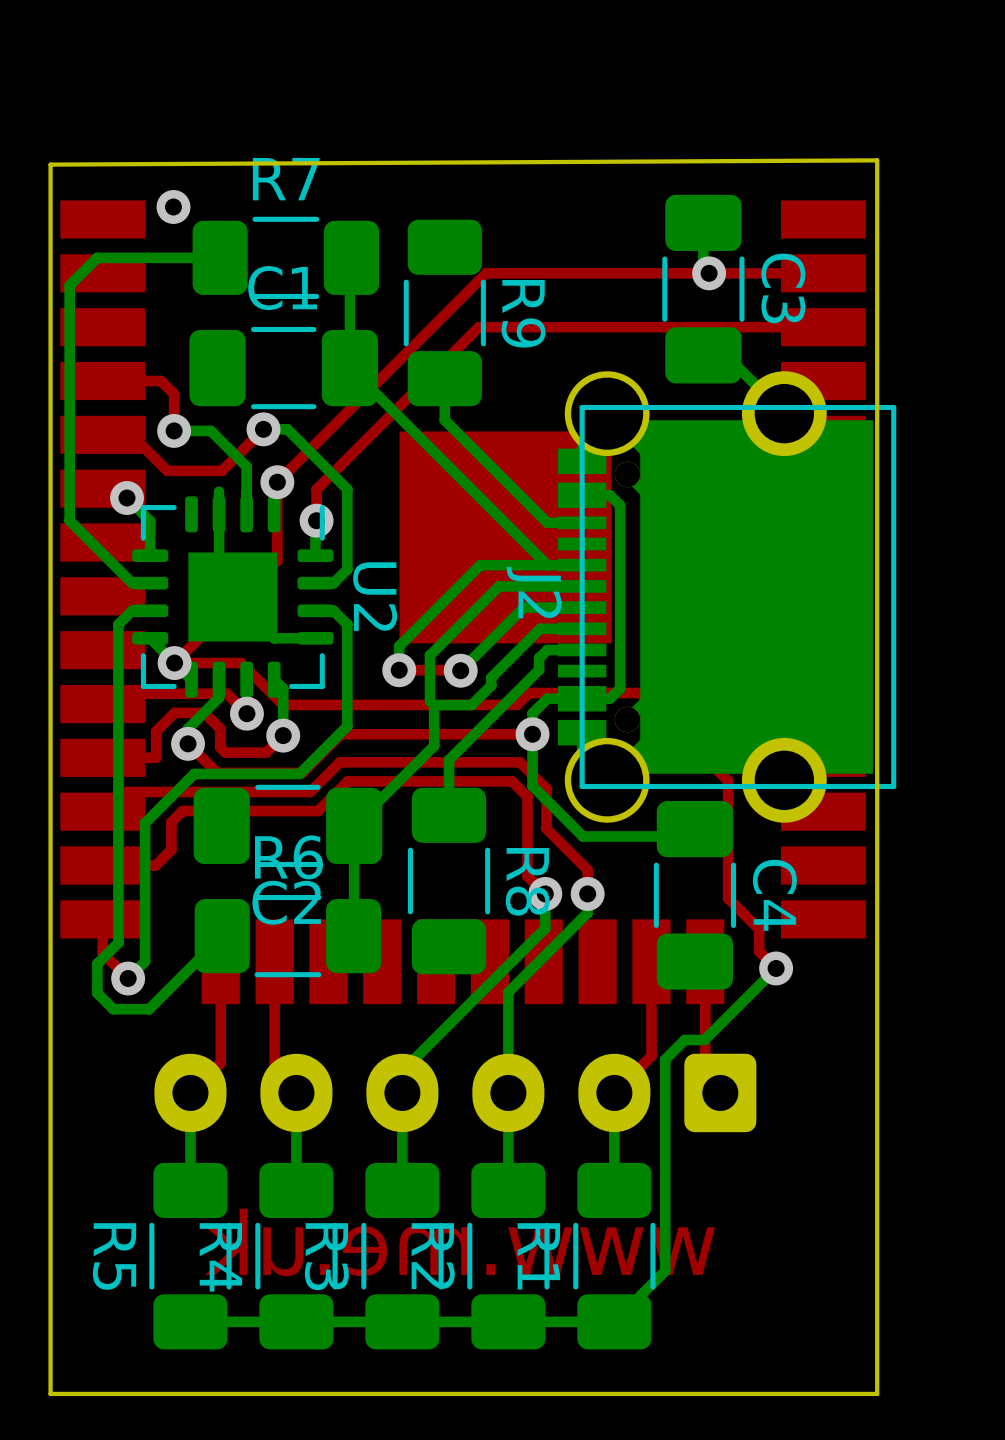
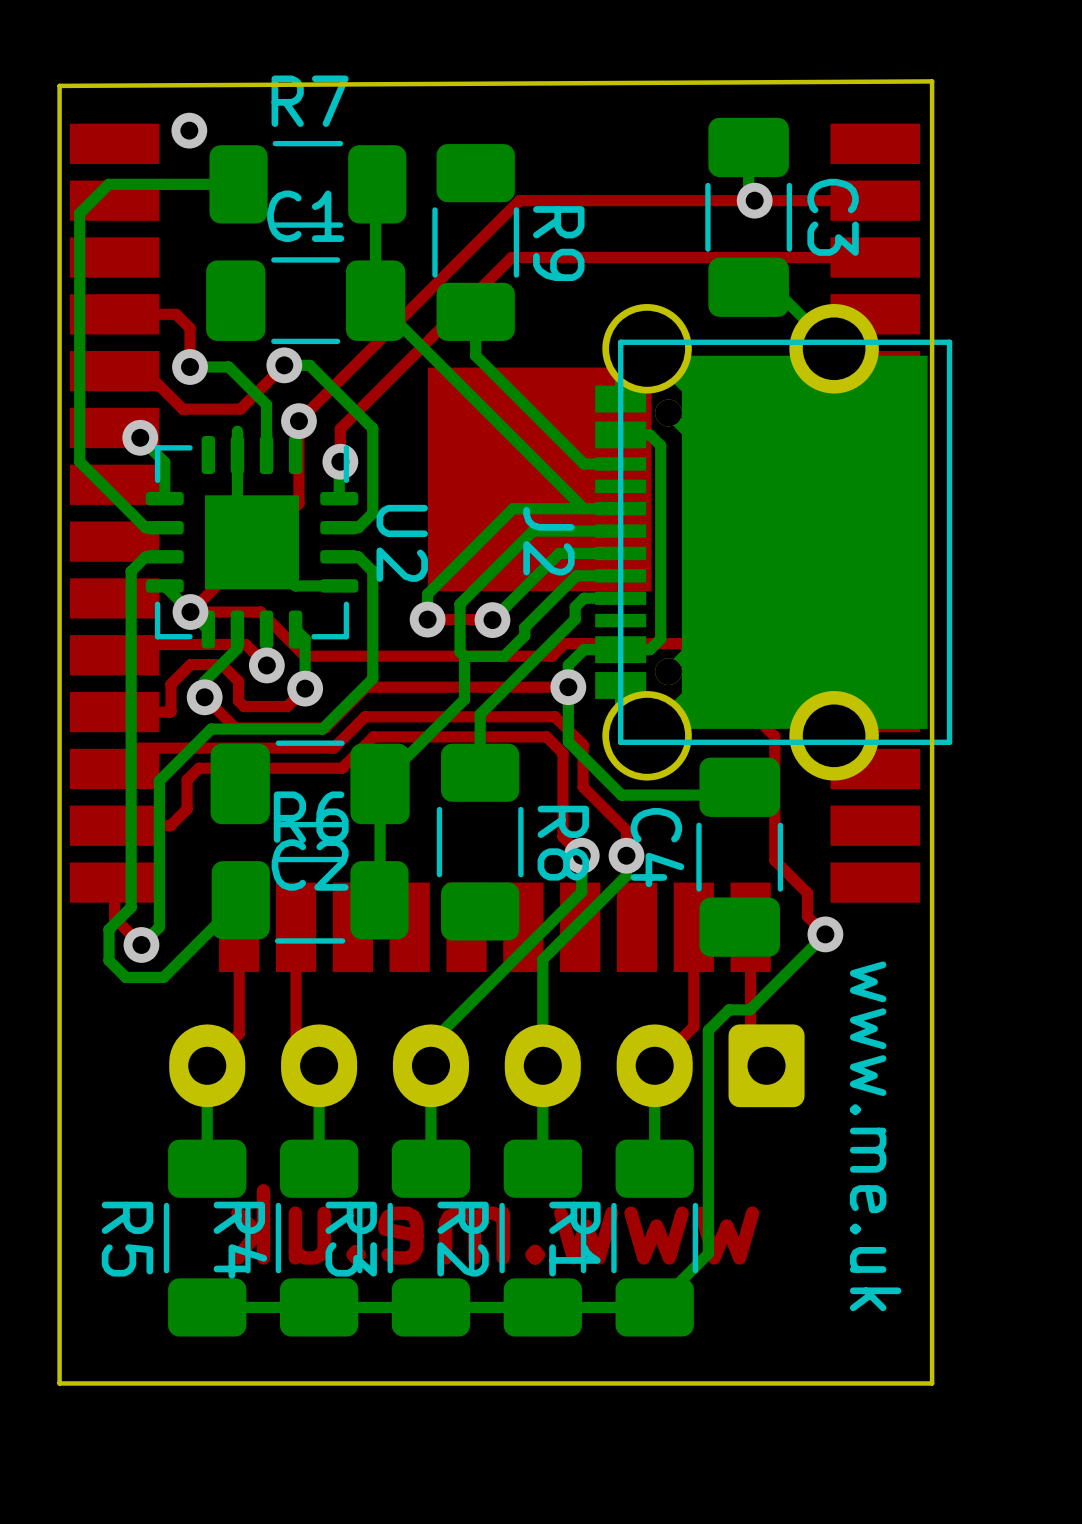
J2 name position: J2 (534, 592) -> J2 (548, 541)
C4 name position: C4 (774, 895) -> C4 (657, 847)
text: none -> www.me.uk (875, 1136)

